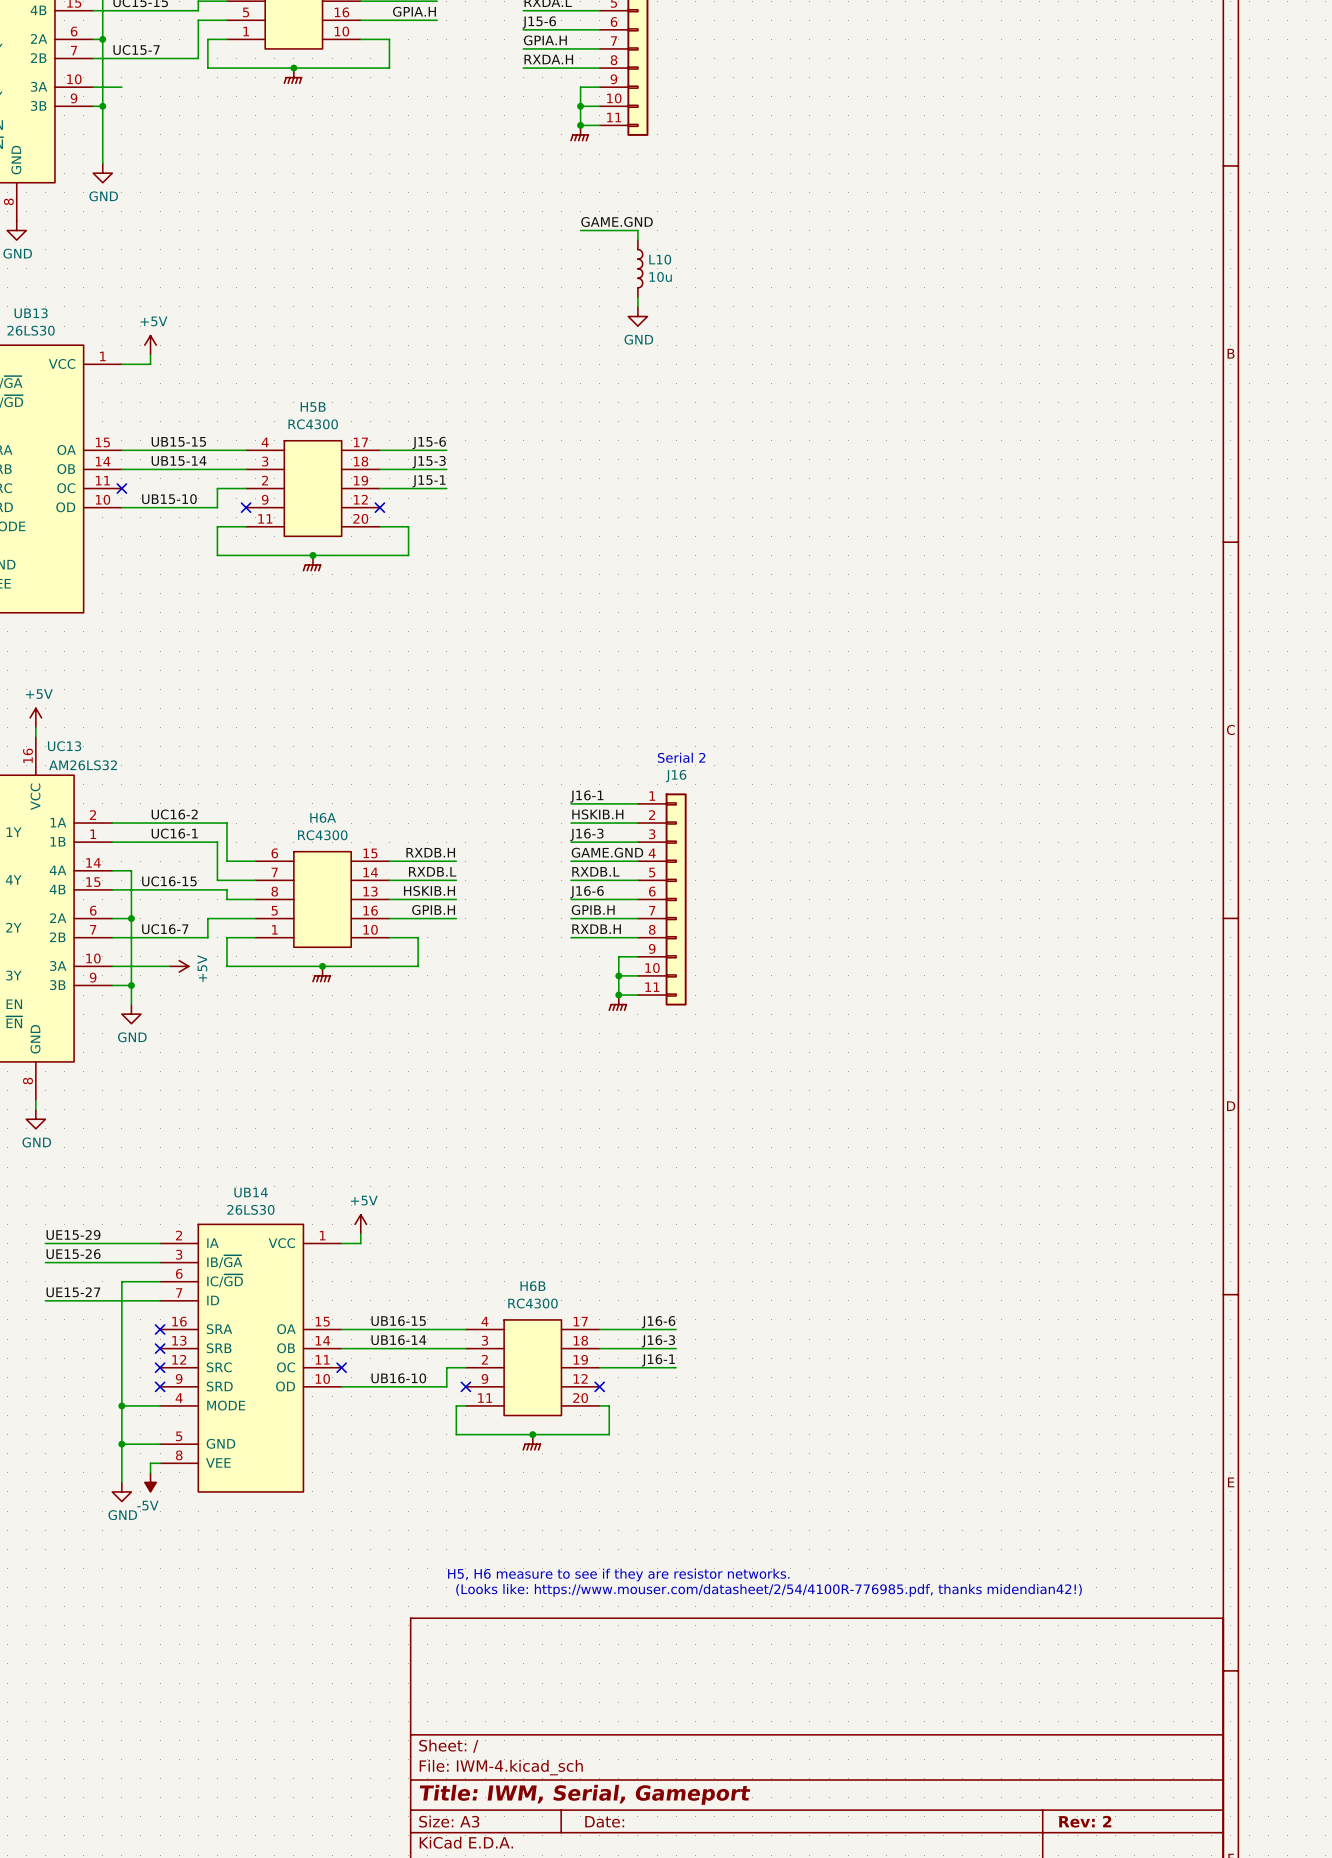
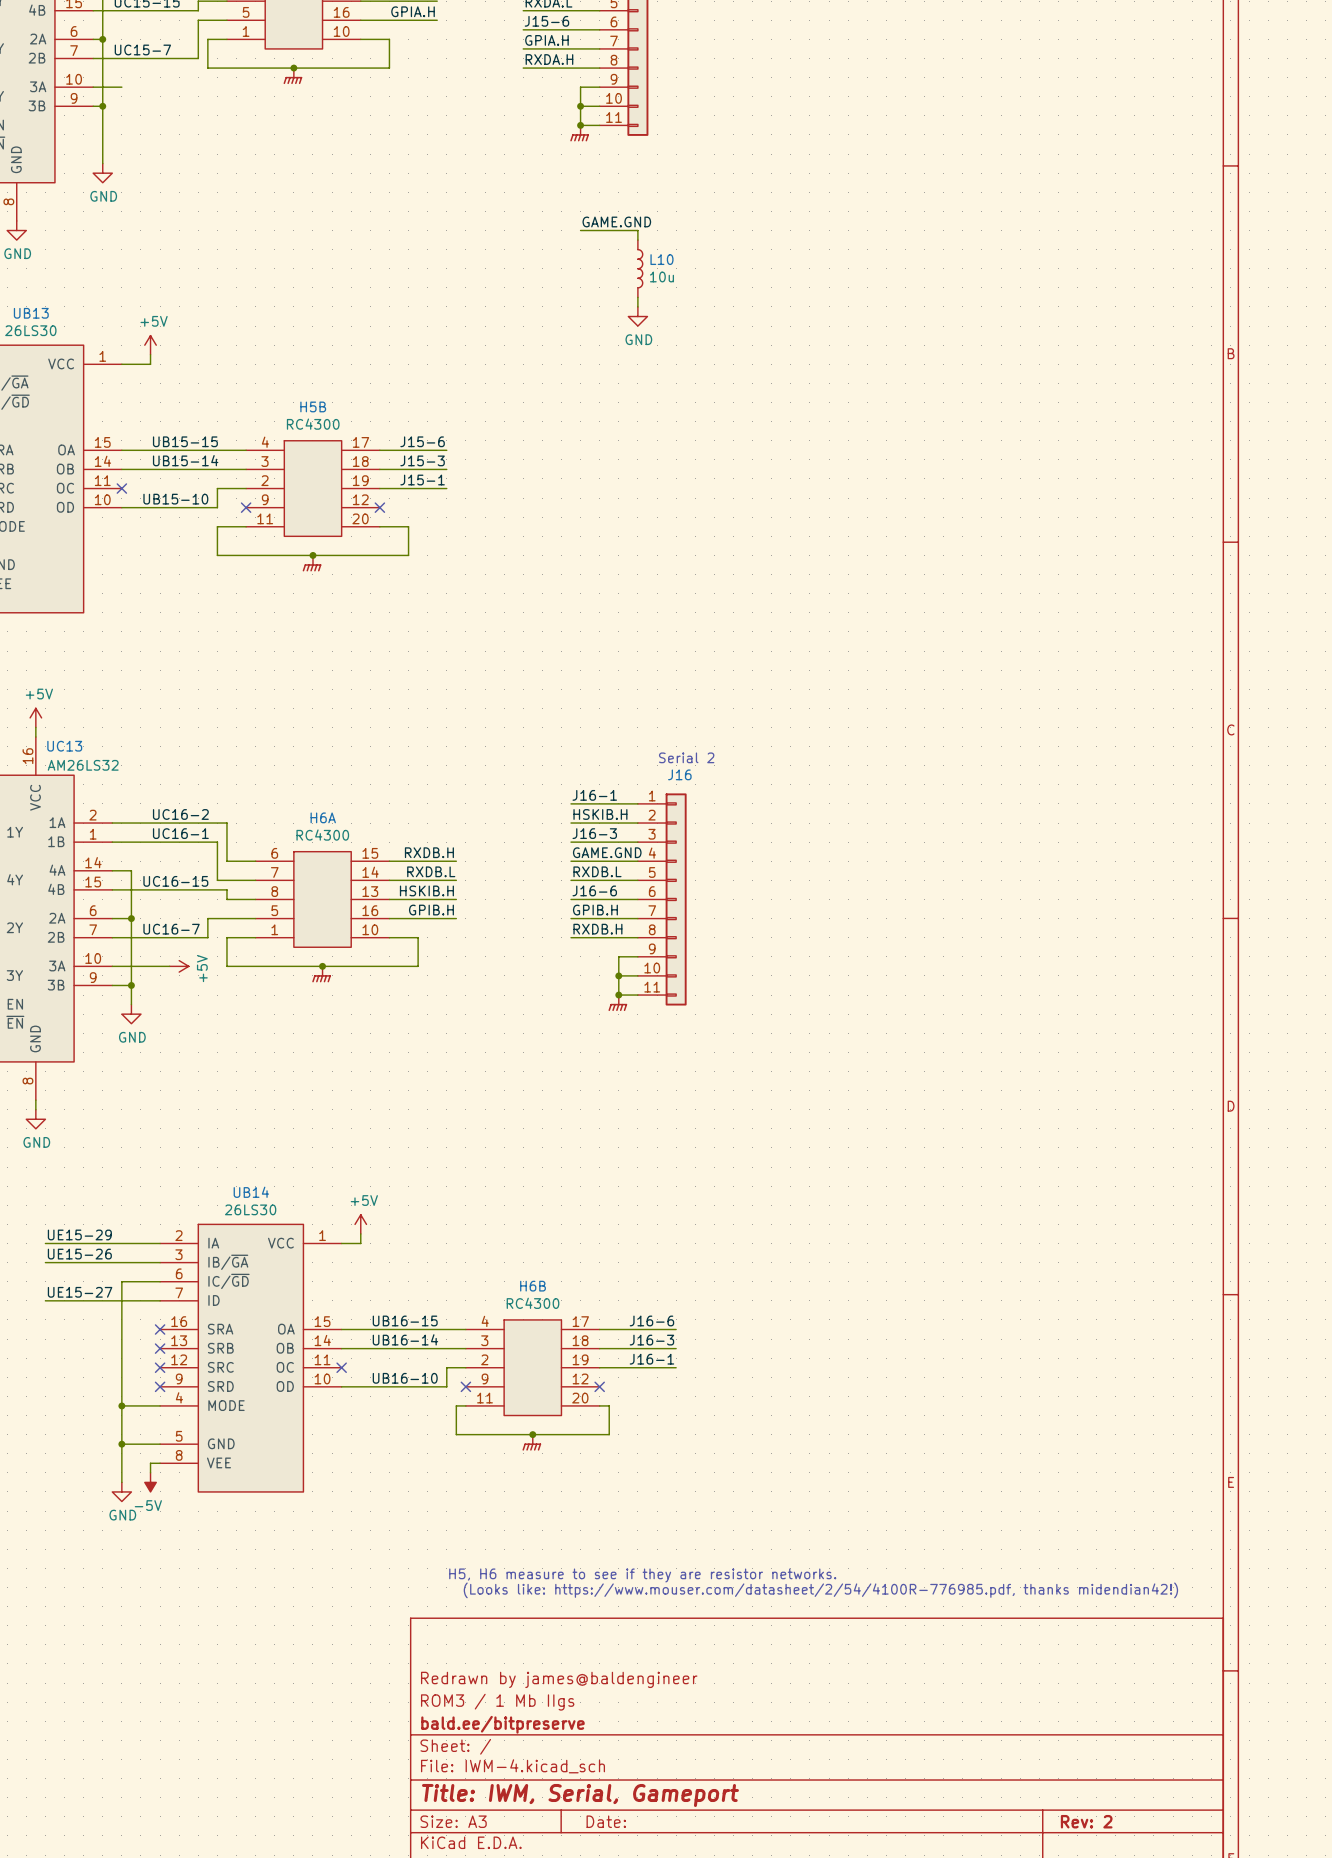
title block: none -> Redrawn by james@baldengineer (559, 1679)
title block: none -> ROM3 / 1 Mb IIgs (497, 1702)
title block: none -> bald.ee/bitpreserve (502, 1724)

